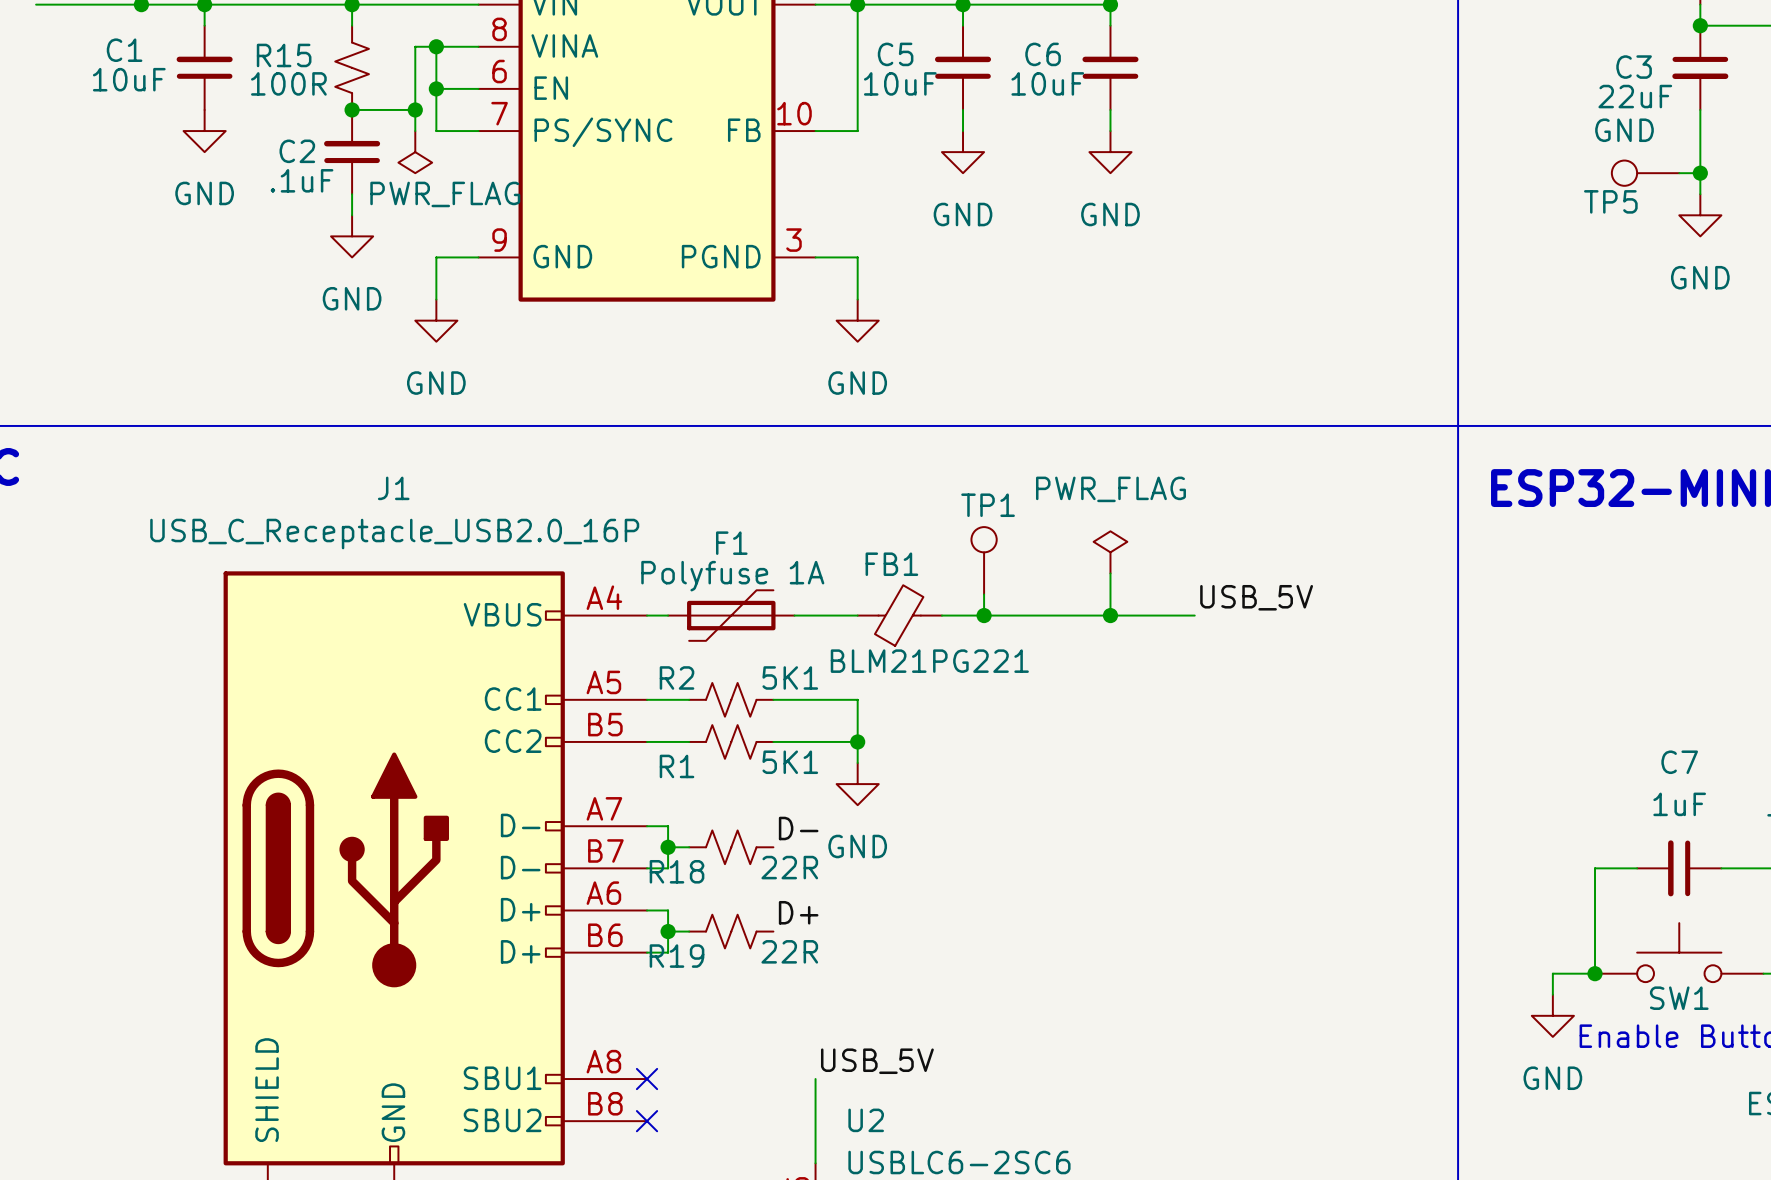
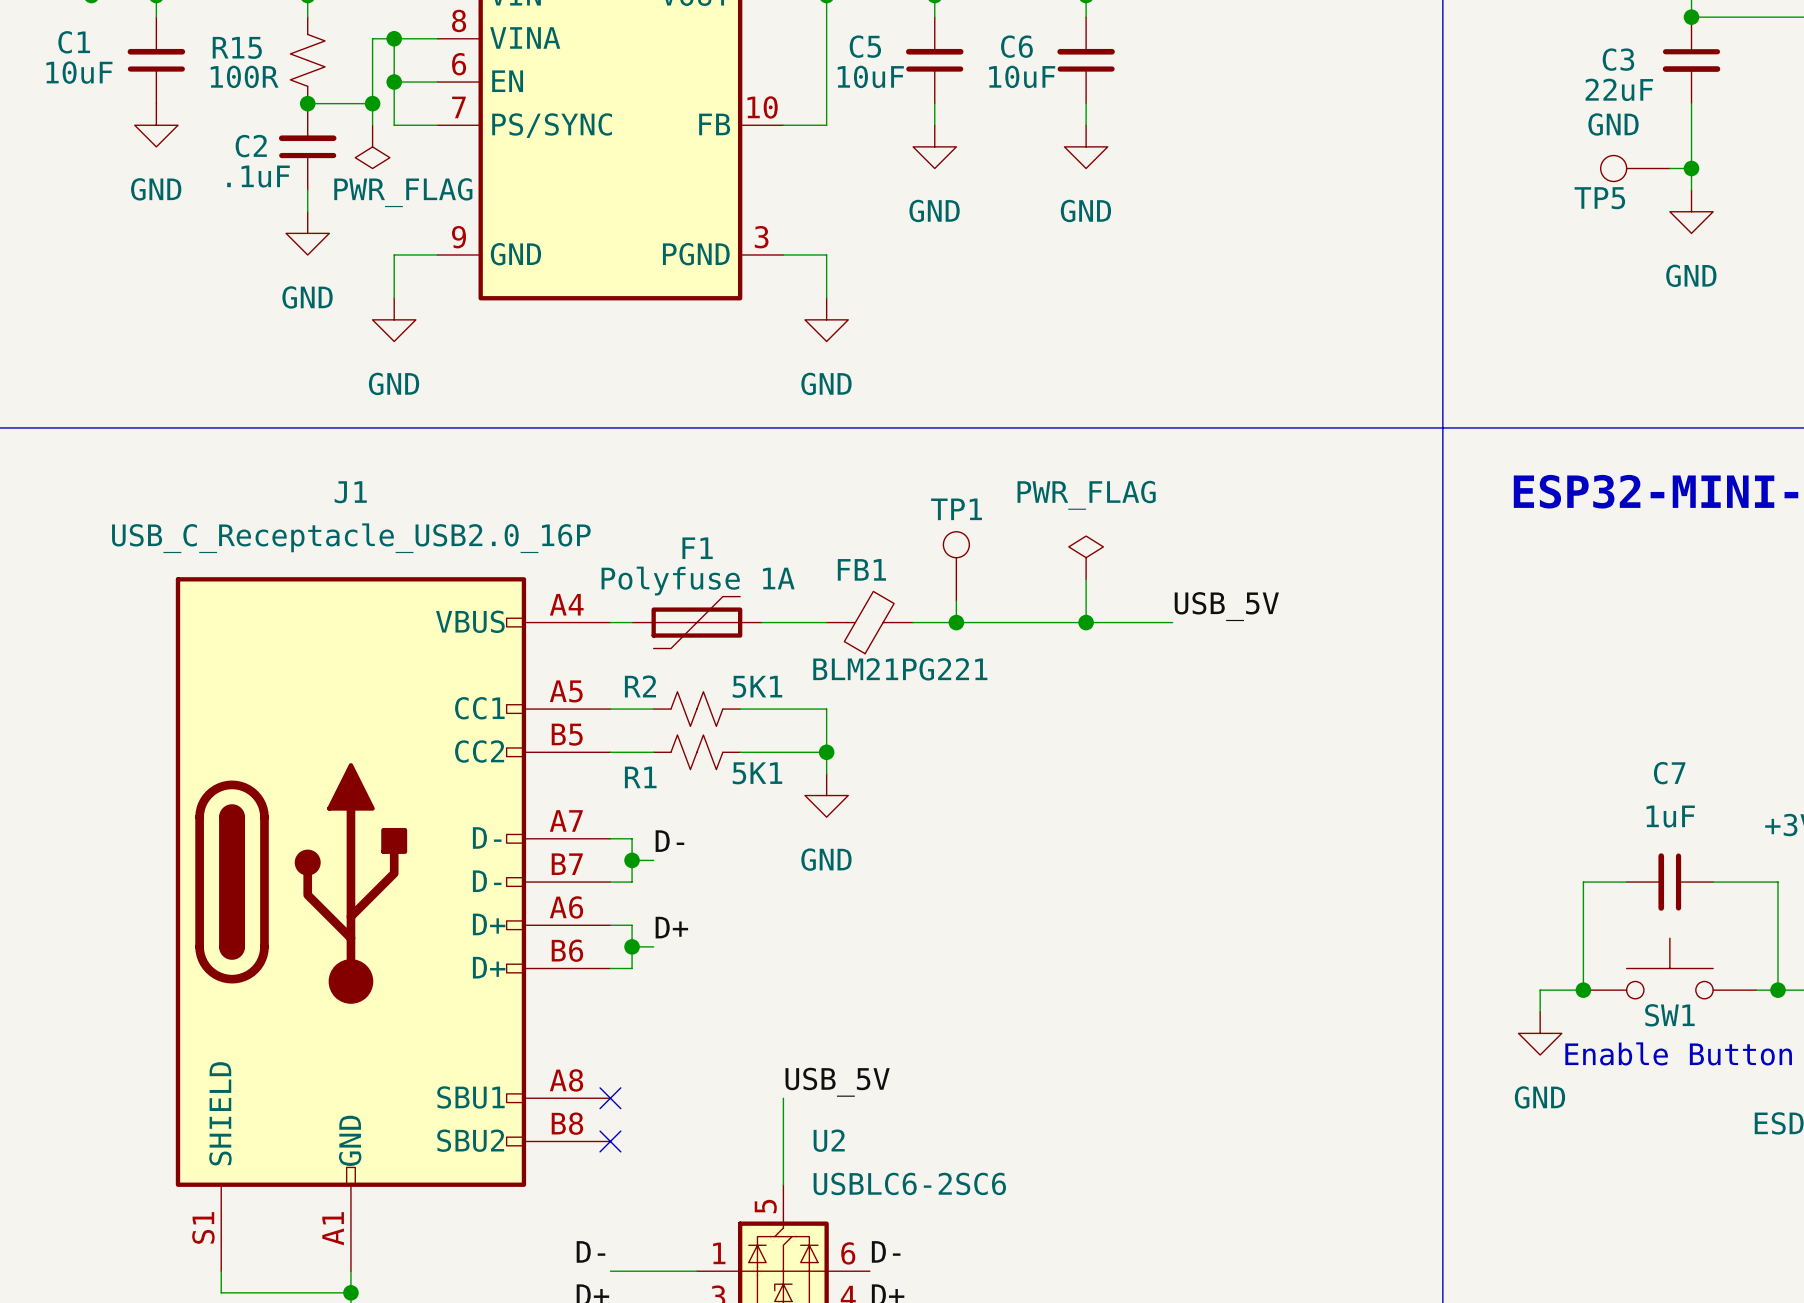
label position: D- (798, 828) -> D- (669, 841)
R18: 22R (731, 847) -> none
label position: D+ (798, 912) -> D+ (671, 927)
R19: 22R (731, 931) -> none

